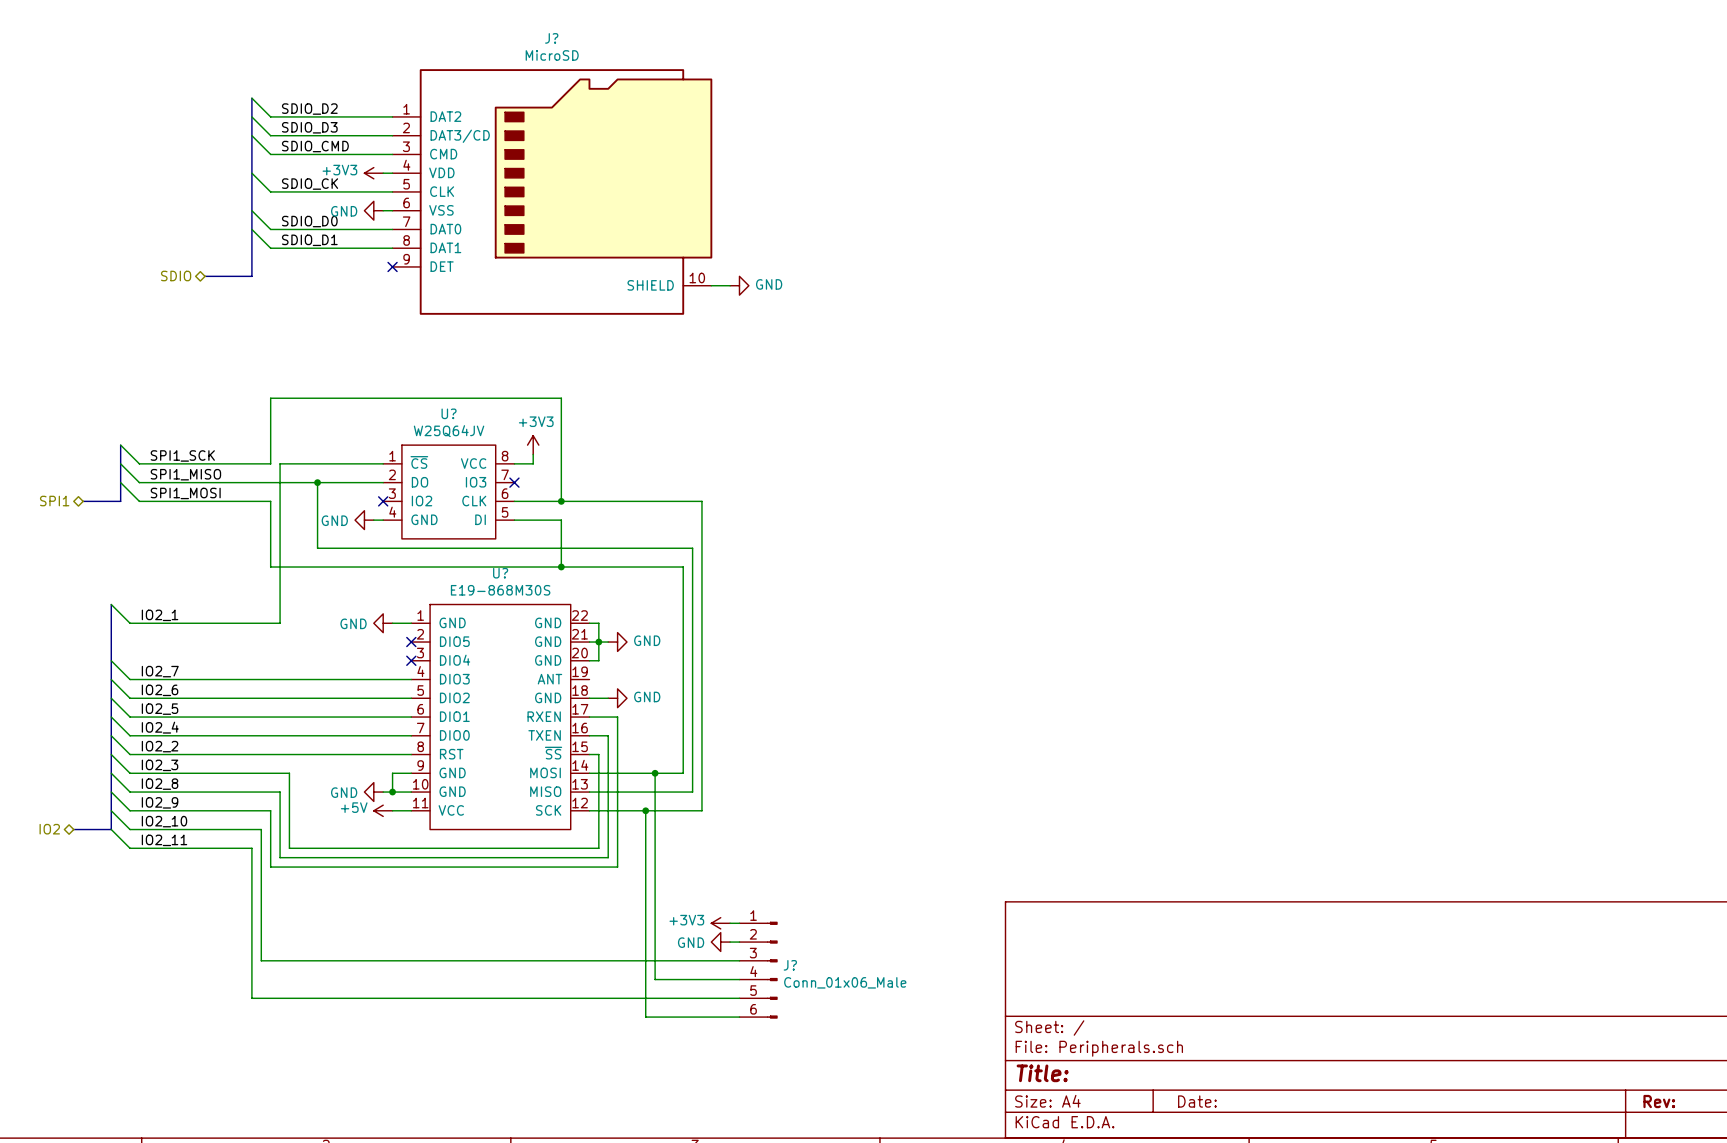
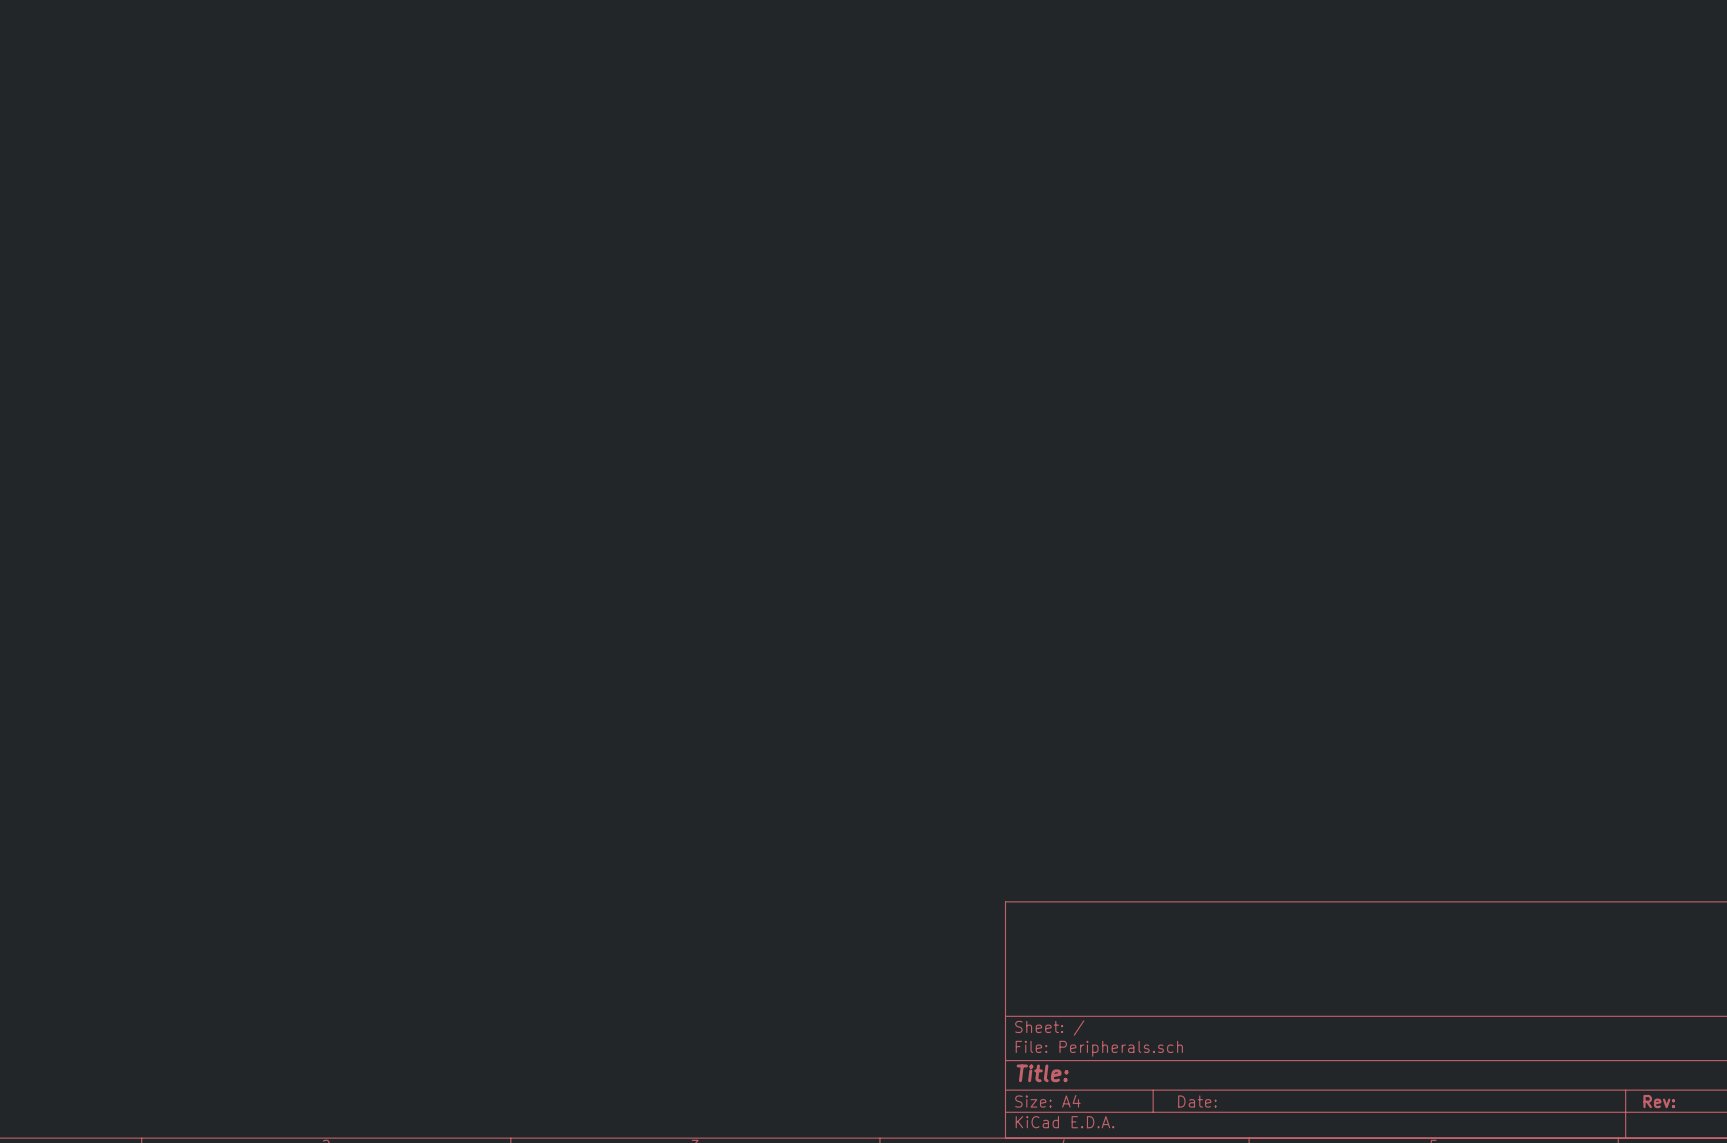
bus: (251, 98) (251, 276) (205, 276) -> none
wire: (251, 98) (270, 116) (392, 116) -> none
label: SDIO_D2 (309, 109) -> none
wire: (251, 116) (270, 135) (392, 135) -> none
label: SDIO_D3 (309, 127) -> none
wire: (251, 135) (270, 154) (392, 154) -> none
label: SDIO_CMD (315, 146) -> none
wire: (251, 173) (270, 191) (392, 191) -> none
power symbol: +3V3 (373, 173) -> none
wire: (383, 173) (392, 173) -> none
label: SDIO_CK (310, 184) -> none
J?: MicroSD (552, 191) -> none
wire: (251, 210) (270, 229) (392, 229) -> none
power symbol: GND (373, 210) -> none
wire: (383, 210) (392, 210) -> none
label: SDIO_D0 (309, 221) -> none
wire: (251, 229) (270, 248) (392, 248) -> none
label: SDIO_D1 (309, 240) -> none
no-connect mark: (392, 266) -> none
hierarchical label: SDIO (176, 276) -> none
wire: (711, 285) (730, 285) -> none
power symbol: GND (739, 285) -> none
bus: (120, 445) (120, 501) (83, 501) -> none
wire: (120, 445) (139, 463) (270, 463) (270, 398) (561, 398) (561, 501) -> none
power symbol: +3V3 (533, 445) -> none
wire: (533, 454) (533, 463) (514, 463) -> none
label: SPI1_SCK (182, 455) -> none
wire: (120, 463) (139, 482) (383, 482) -> none
wire: (383, 463) (280, 463) (280, 623) (130, 623) (111, 604) -> none
label: SPI1_MISO (185, 474) -> none
wire: (120, 482) (139, 501) (270, 501) (270, 567) (683, 567) (683, 773) (589, 773) -> none
wire: (317, 482) (317, 548) (692, 548) (692, 792) (589, 792) -> none
junction: (317, 482) -> none
no-connect mark: (514, 482) -> none
U?: W25Q64JV (448, 492) -> none
label: SPI1_MOSI (185, 493) -> none
hierarchical label: SPI1 (54, 501) -> none
no-connect mark: (383, 501) -> none
wire: (514, 501) (701, 501) (701, 810) (589, 810) -> none
junction: (561, 501) -> none
power symbol: GND (364, 520) -> none
wire: (373, 520) (383, 520) -> none
wire: (514, 520) (561, 520) (561, 567) -> none
junction: (561, 567) -> none
bus: (111, 604) (111, 829) (73, 829) -> none
label: IO2_1 (160, 615) -> none
power symbol: GND (383, 623) -> none
wire: (392, 623) (411, 623) -> none
wire: (589, 623) (598, 623) (598, 660) (589, 660) -> none
no-connect mark: (411, 642) -> none
wire: (589, 642) (608, 642) -> none
junction: (598, 642) -> none
power symbol: GND (617, 642) -> none
wire: (111, 660) (130, 679) (411, 679) -> none
no-connect mark: (411, 660) -> none
label: IO2_7 (160, 671) -> none
wire: (111, 679) (130, 698) (411, 698) -> none
label: IO2_6 (160, 690) -> none
wire: (111, 698) (130, 717) (411, 717) -> none
wire: (589, 698) (608, 698) -> none
power symbol: GND (617, 698) -> none
label: IO2_5 (160, 709) -> none
wire: (111, 717) (130, 735) (411, 735) -> none
U?: E19-868M30S (500, 717) -> none
wire: (589, 717) (617, 717) (617, 867) (270, 867) (270, 810) (130, 810) (111, 792) -> none
label: IO2_4 (160, 727) -> none
wire: (111, 735) (130, 754) (411, 754) -> none
wire: (589, 735) (608, 735) (608, 857) (280, 857) (280, 792) (130, 792) (111, 773) -> none
label: IO2_2 (160, 746) -> none
wire: (111, 754) (130, 773) (289, 773) (289, 848) (598, 848) (598, 754) (589, 754) -> none
label: IO2_3 (160, 765) -> none
wire: (411, 773) (392, 773) (392, 792) -> none
wire: (655, 773) (655, 979) (739, 979) -> none
junction: (655, 773) -> none
label: IO2_8 (160, 784) -> none
power symbol: GND (373, 792) -> none
wire: (383, 792) (411, 792) -> none
junction: (392, 792) -> none
label: IO2_9 (160, 802) -> none
wire: (111, 810) (130, 829) (261, 829) (261, 960) (739, 960) -> none
power symbol: +5V (383, 810) -> none
wire: (392, 810) (411, 810) -> none
wire: (645, 810) (645, 1017) (739, 1017) -> none
junction: (645, 810) -> none
label: IO2_10 (164, 821) -> none
hierarchical label: IO2 (49, 829) -> none
wire: (111, 829) (130, 848) (251, 848) (251, 998) (739, 998) -> none
label: IO2_11 (164, 840) -> none
power symbol: +3V3 (720, 923) -> none
wire: (730, 923) (739, 923) -> none
power symbol: GND (720, 942) -> none
wire: (730, 942) (739, 942) -> none
J?: Conn_01x06_Male (758, 970) -> none

